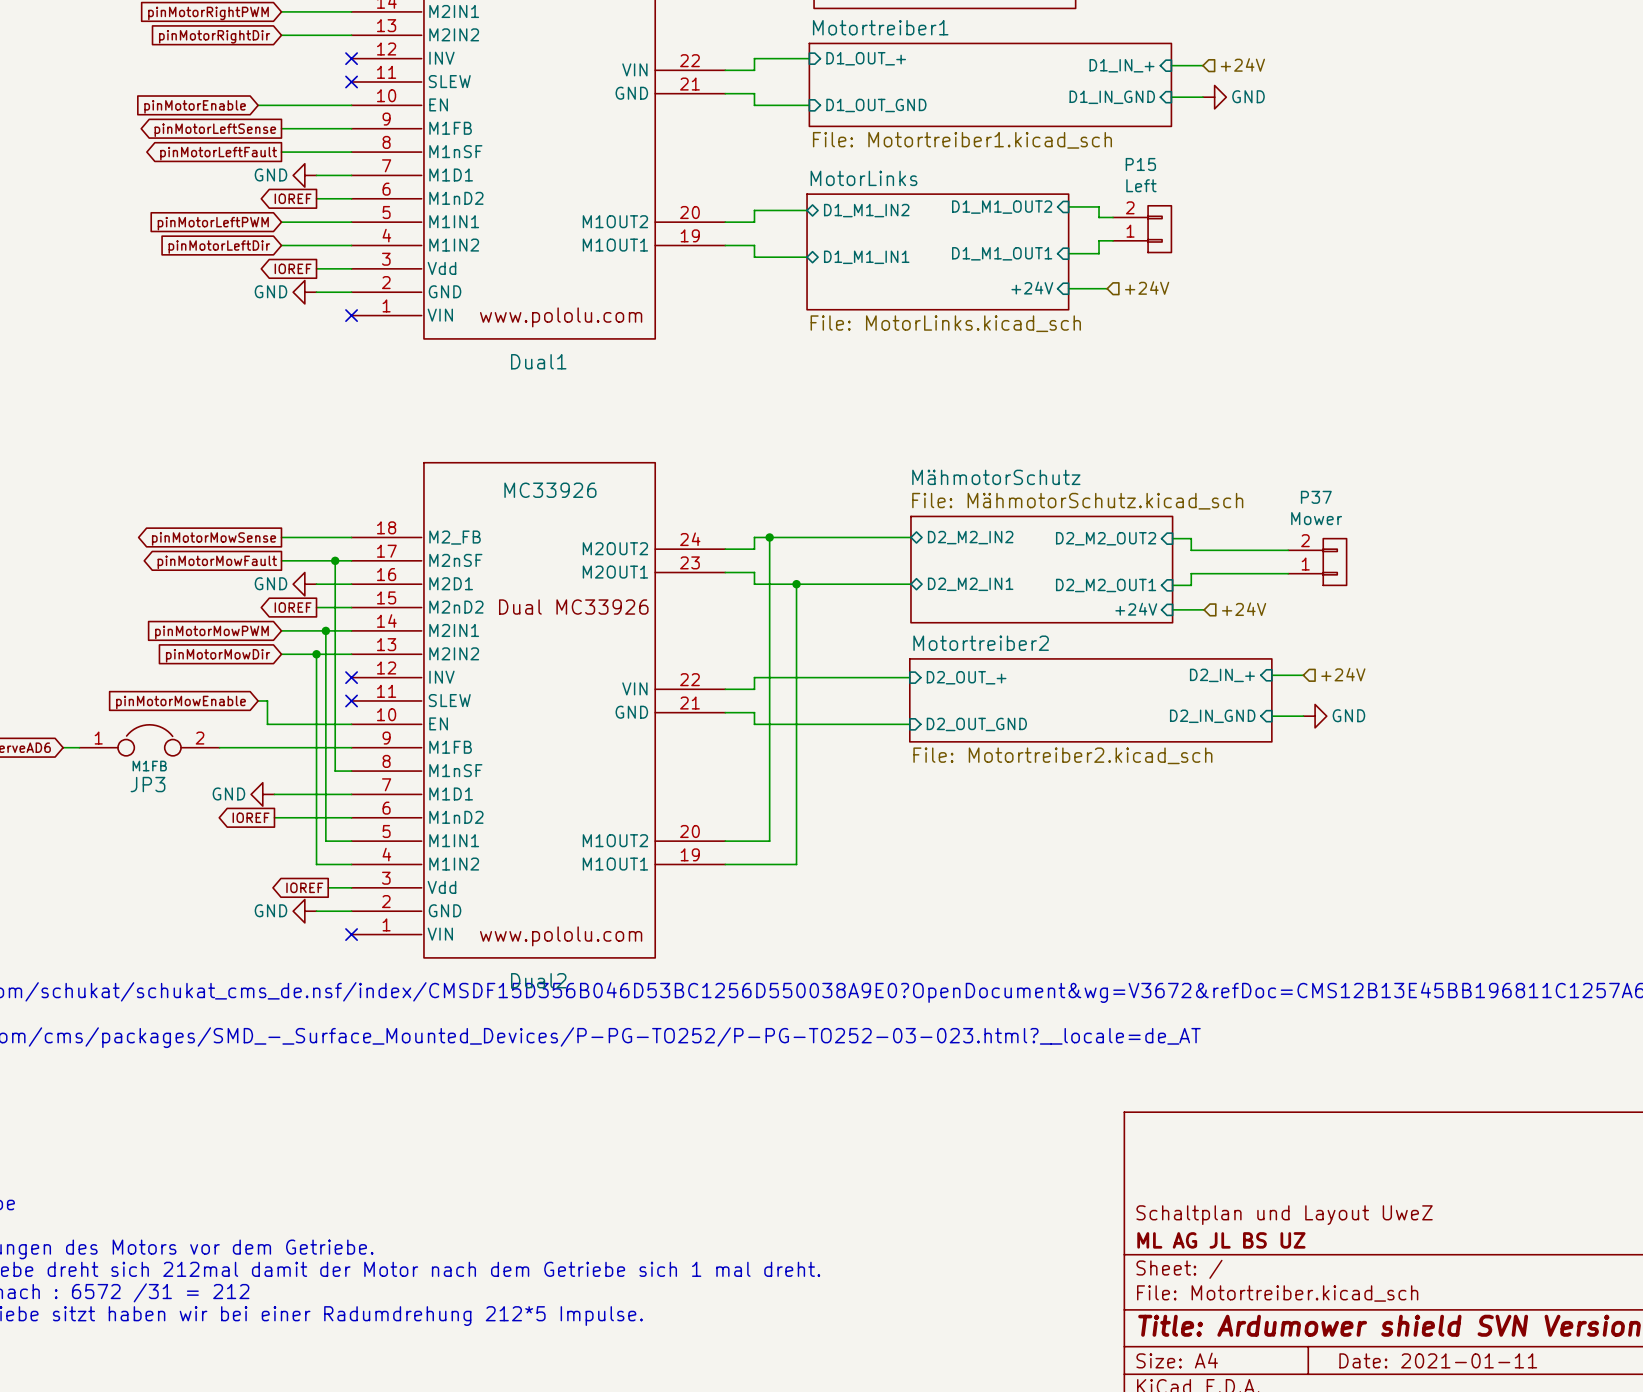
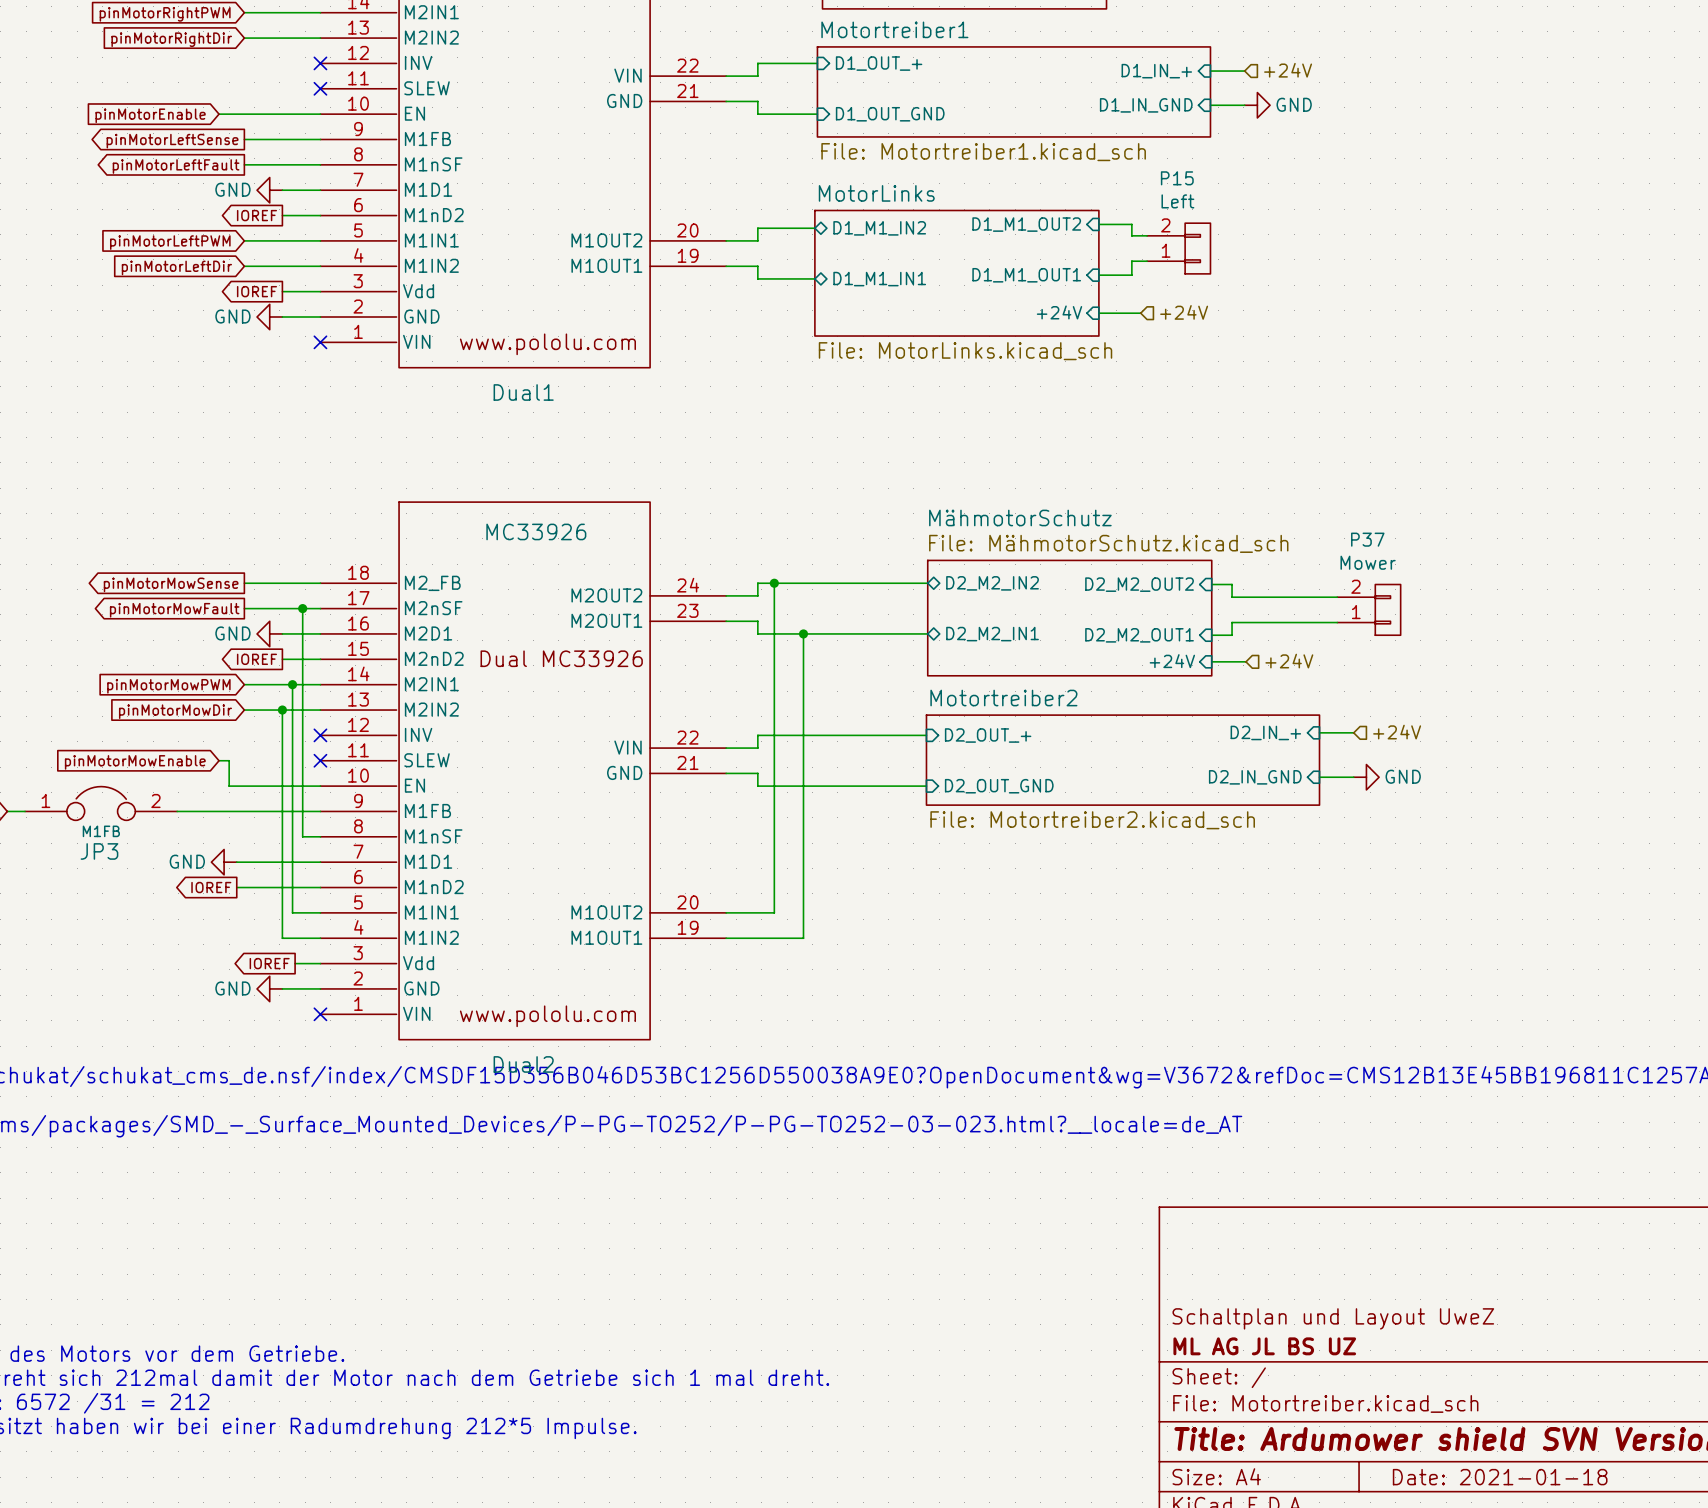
title block: Date: 2021-01-11 (1438, 1360) -> Date: 2021-01-18 (1500, 1477)

